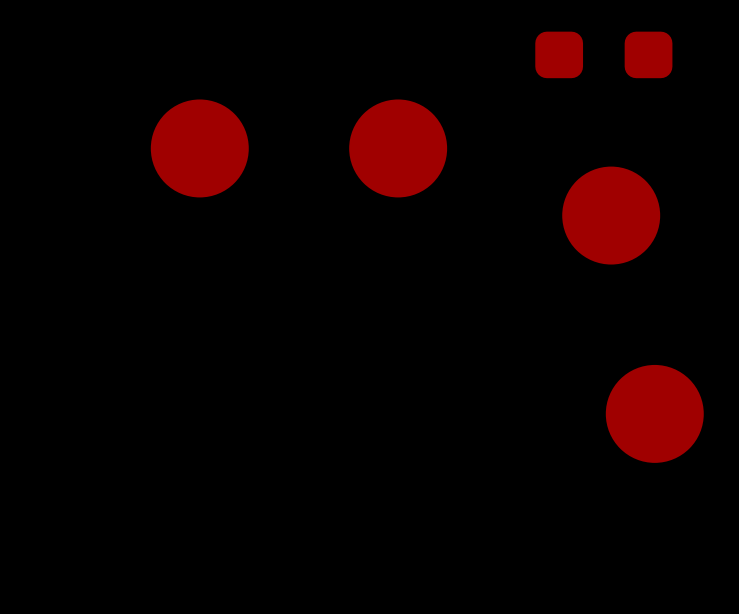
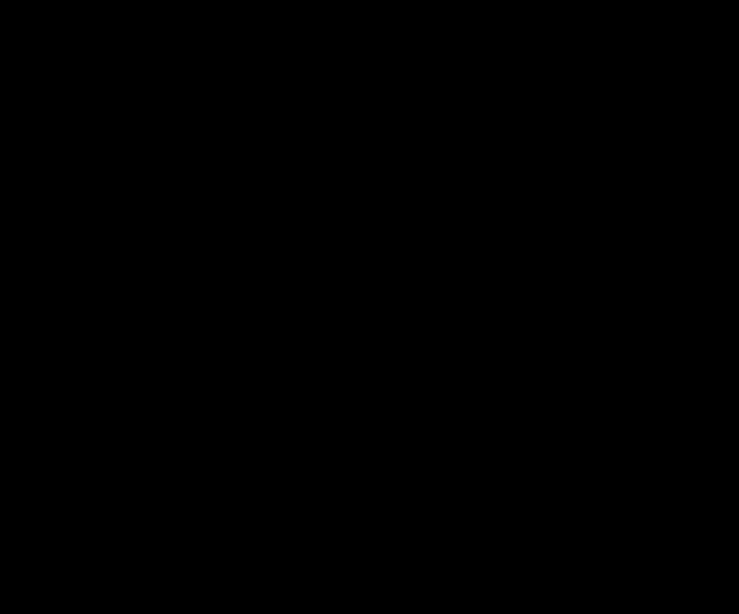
part: (603, 54) -> none
part: (199, 148) -> none
part: (398, 148) -> none
part: (611, 215) -> none
part: (654, 413) -> none

